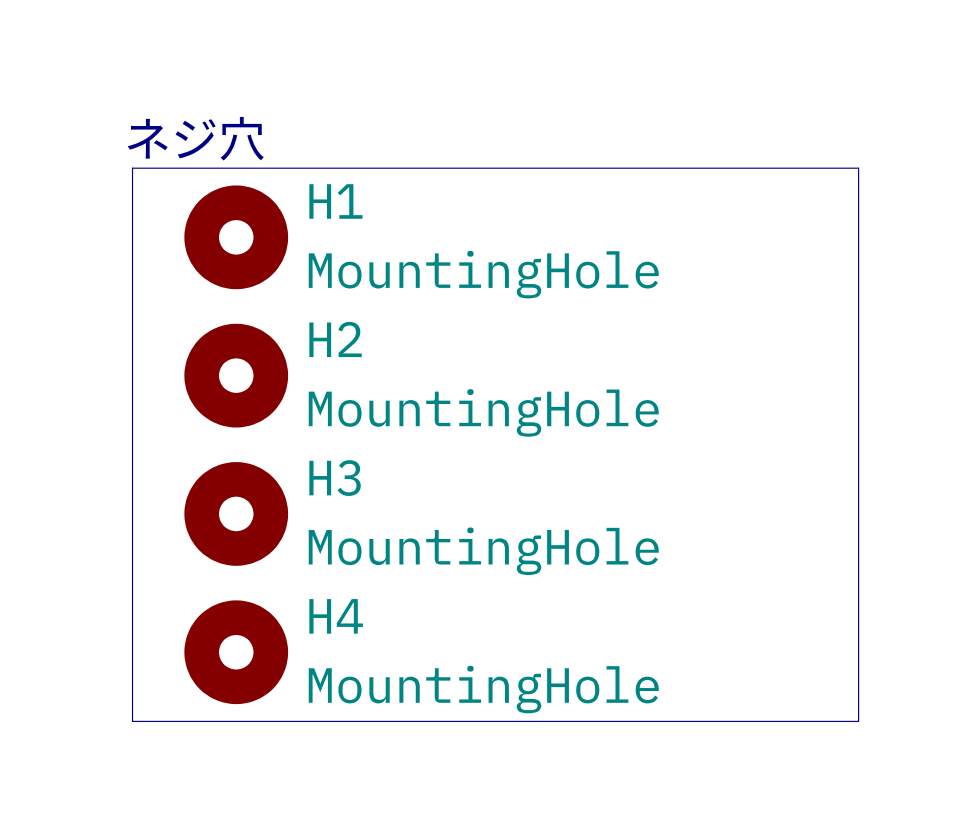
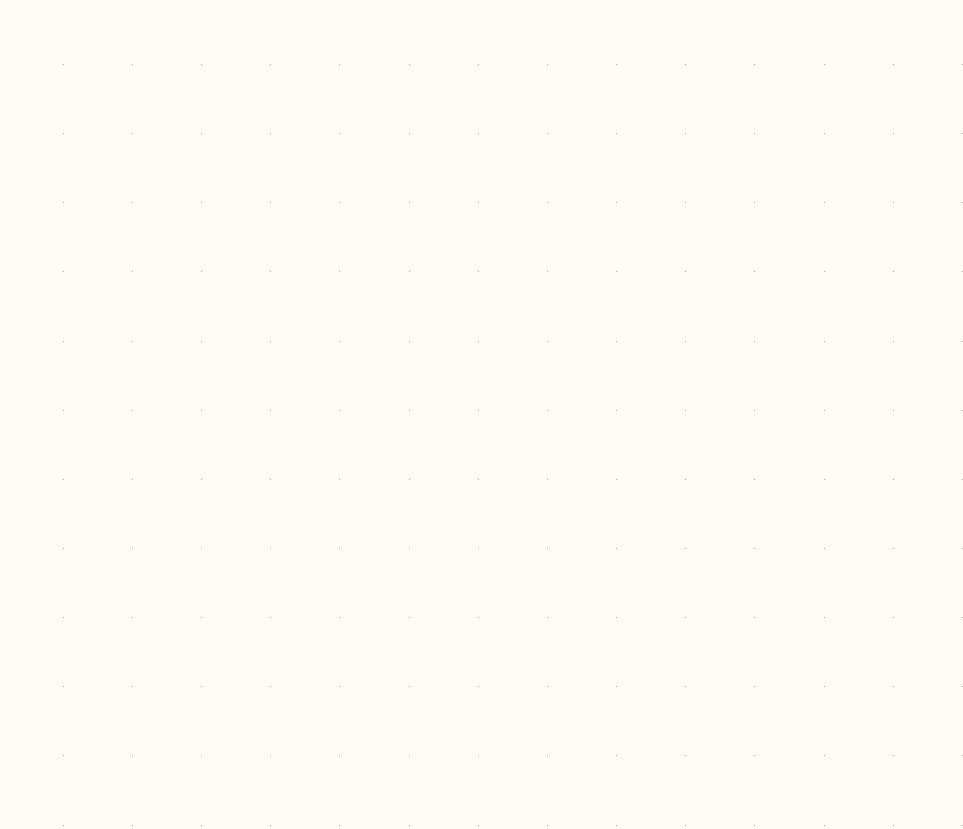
text: ネジ穴 (195, 138) -> none
line: (132, 168) (858, 168) (858, 721) (132, 721) (132, 168) -> none
H1: MountingHole (236, 237) -> none
H2: MountingHole (236, 375) -> none
H3: MountingHole (236, 513) -> none
H4: MountingHole (236, 652) -> none

